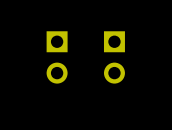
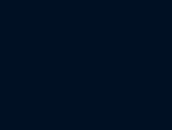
part: (57, 57) -> none
part: (114, 57) -> none

